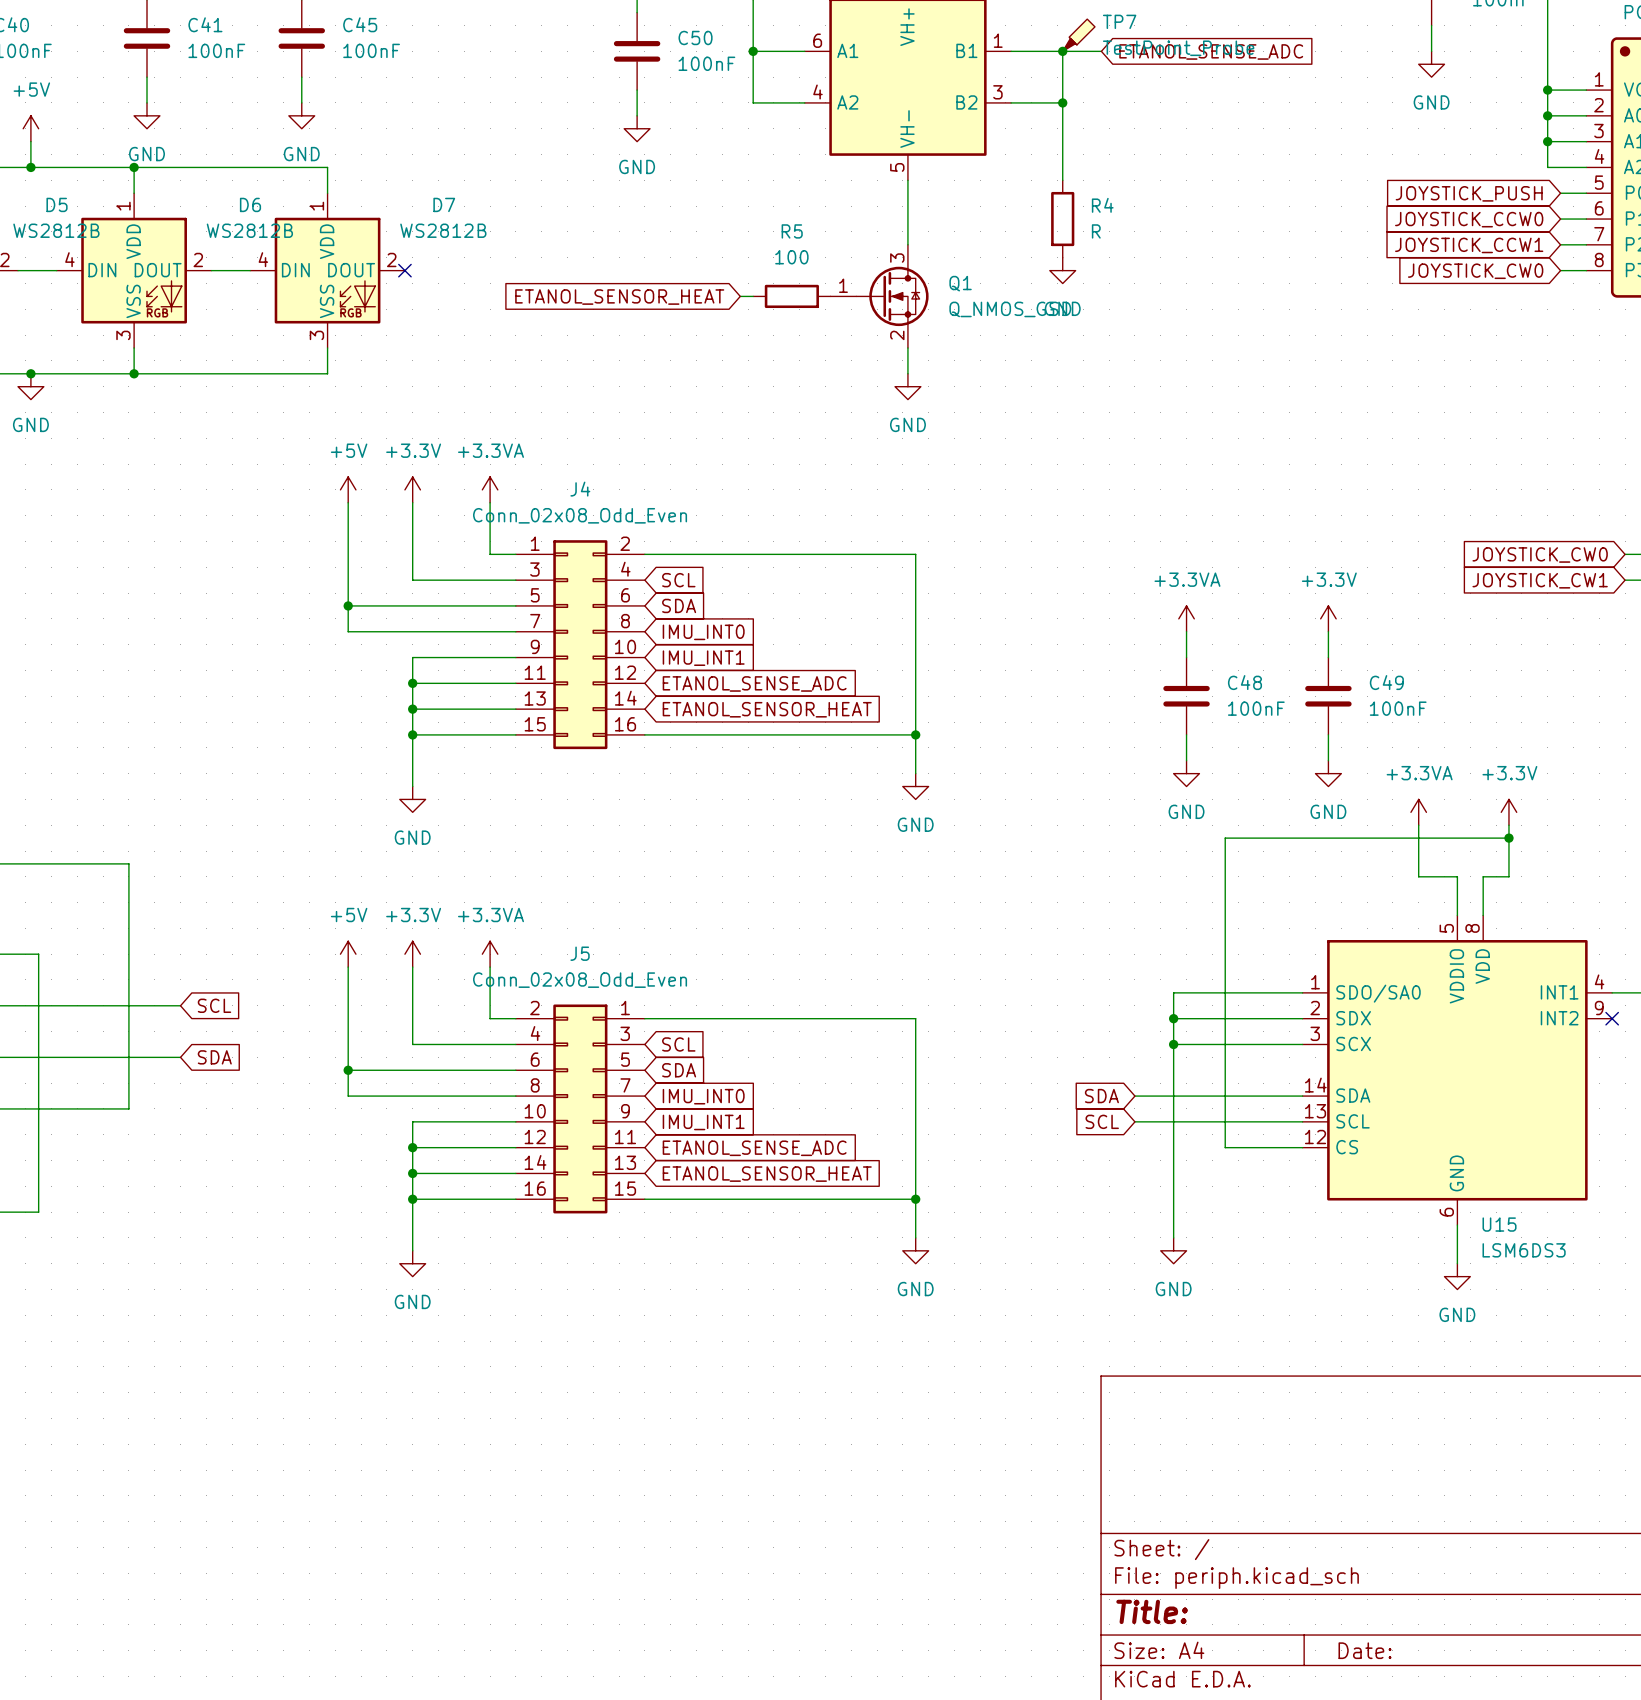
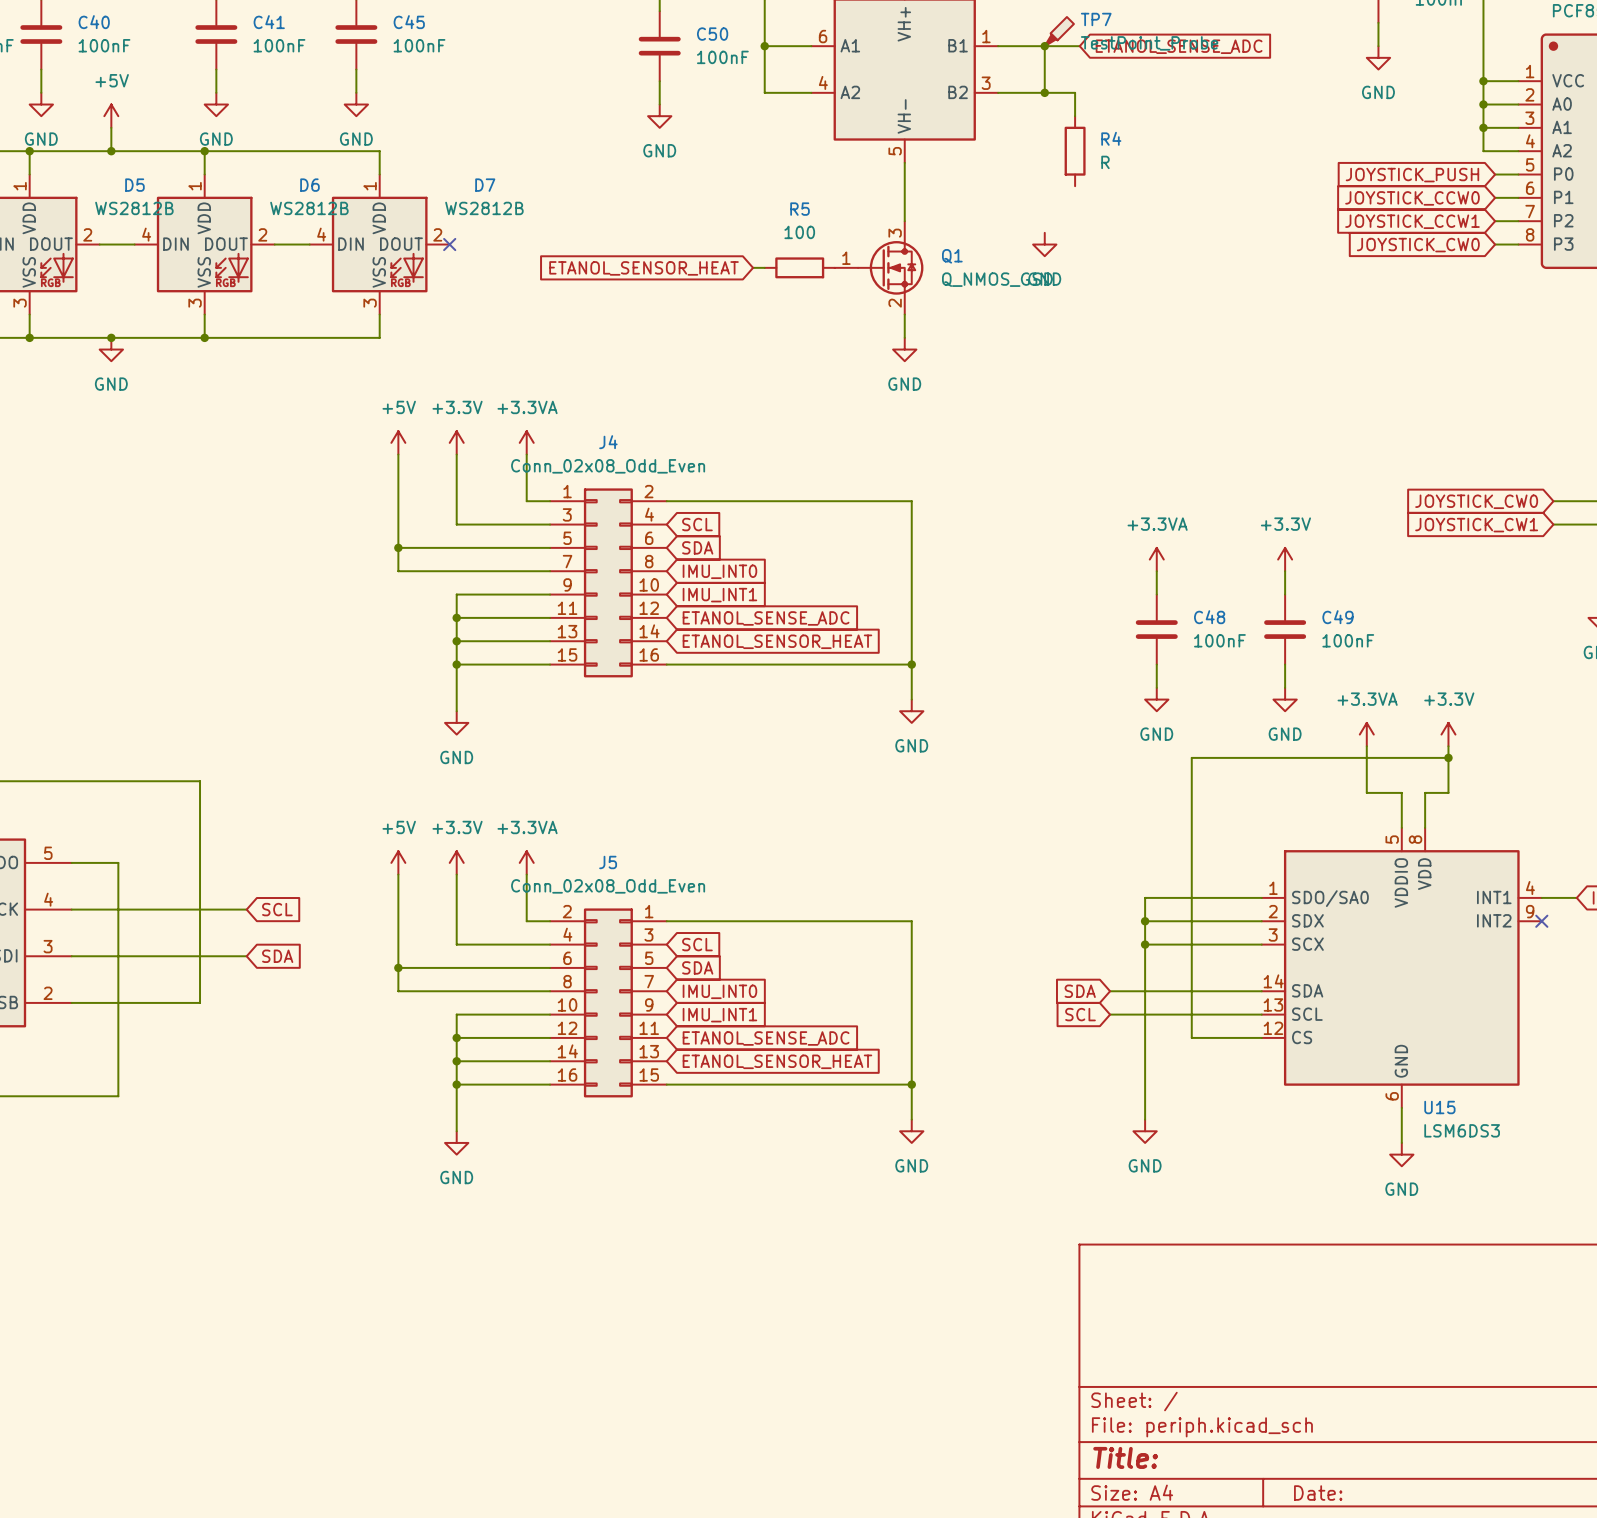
wire: (1062, 102) (1062, 180) -> (1044, 92) (1075, 92) (1075, 116)
R4 position: (1062, 219) -> (1075, 151)

